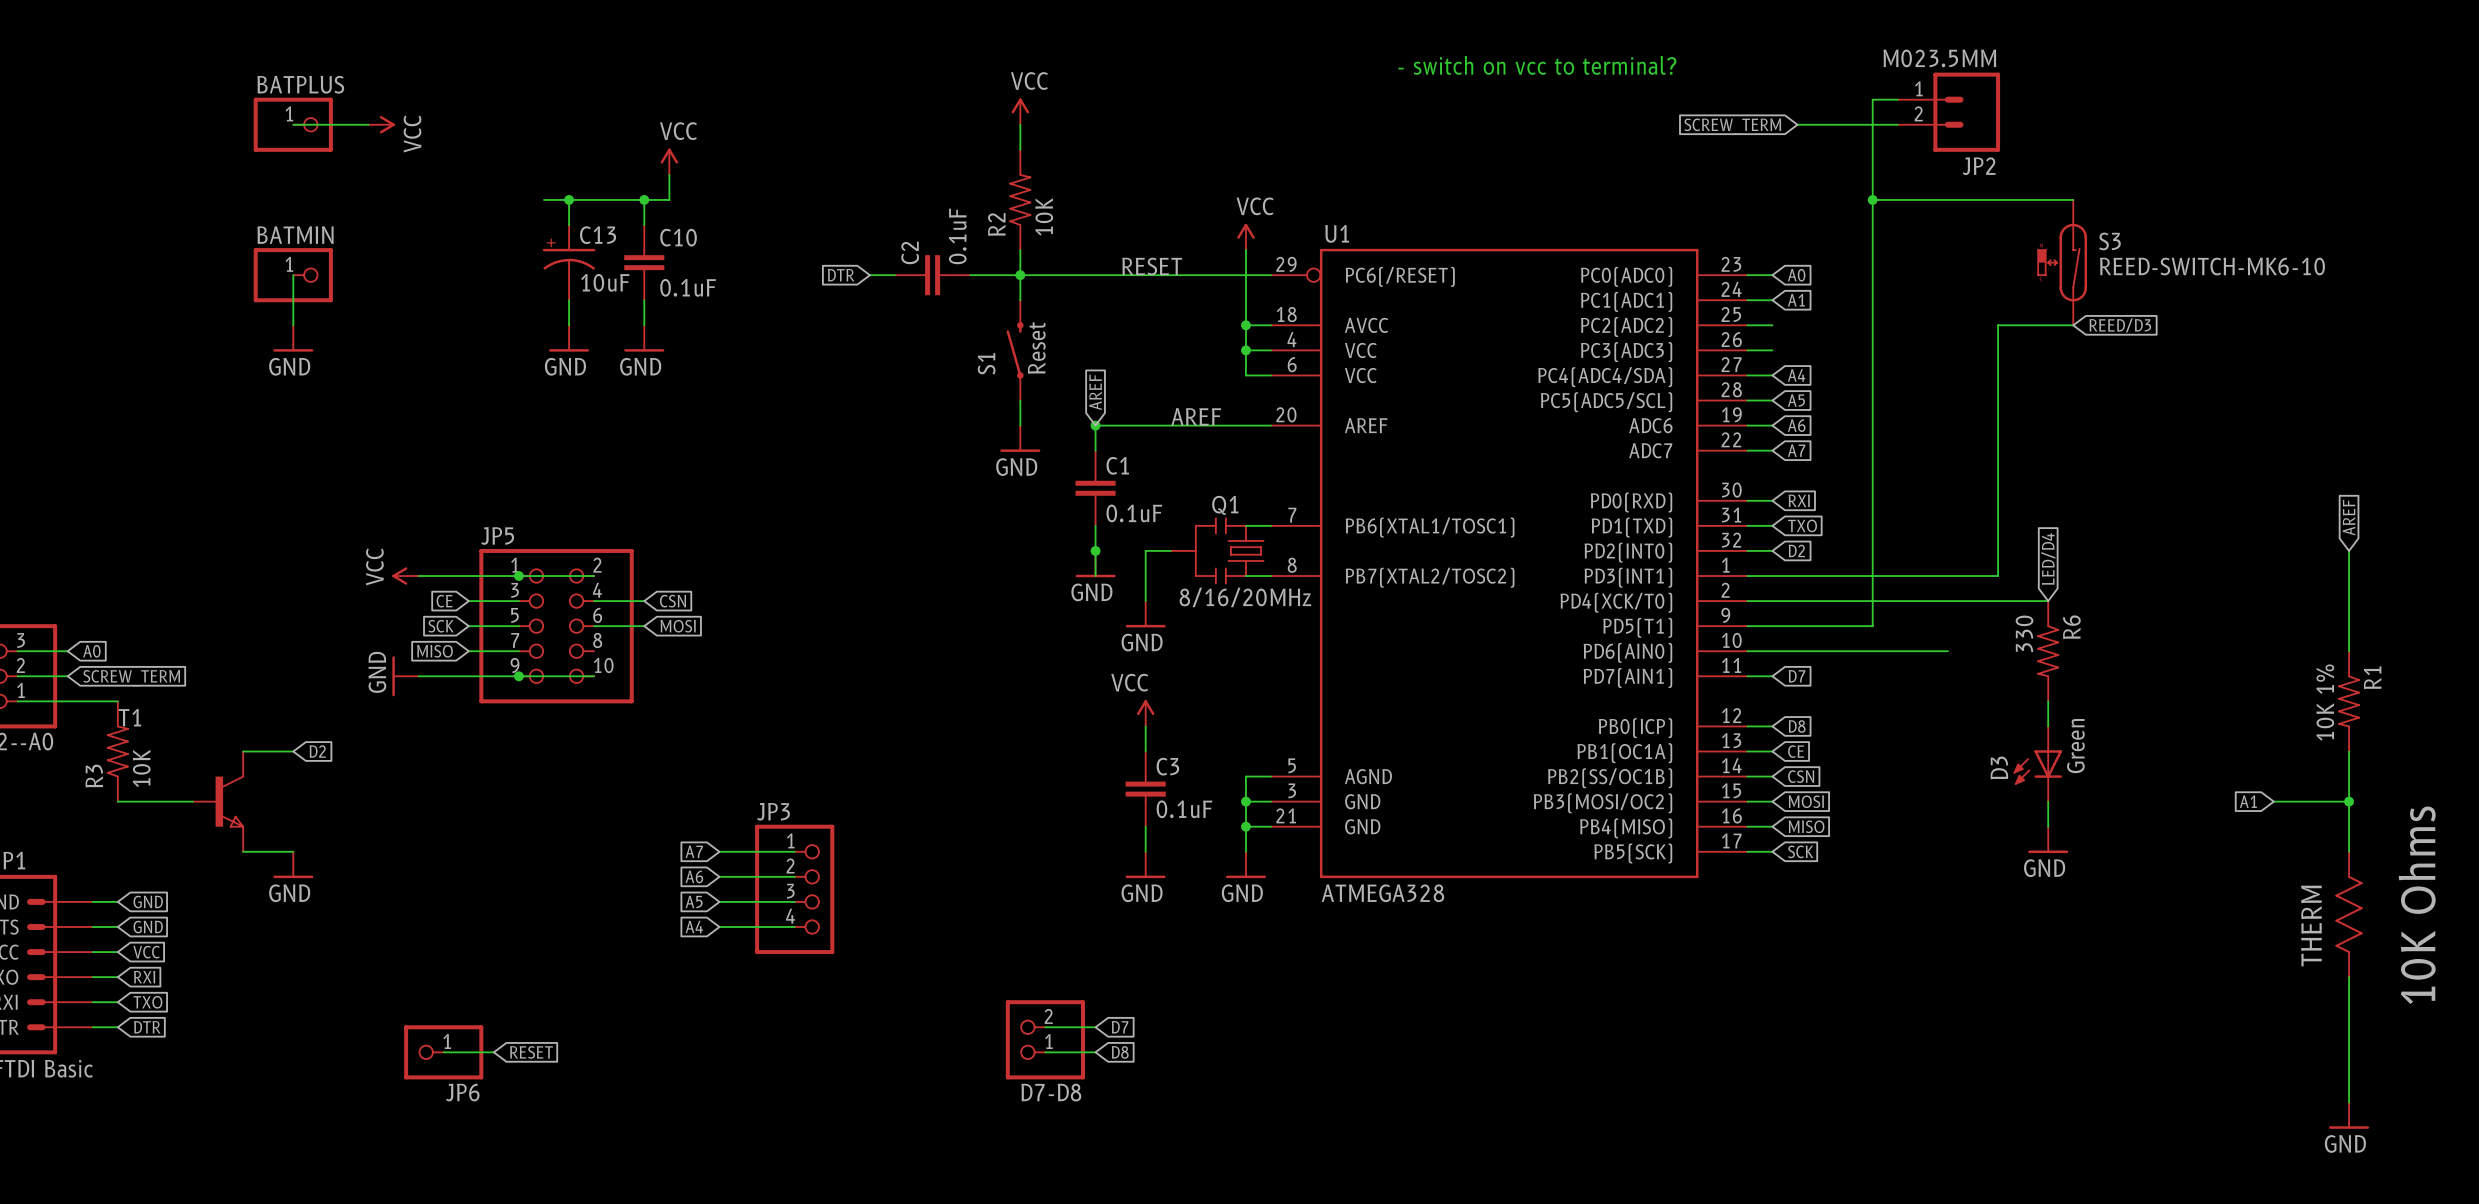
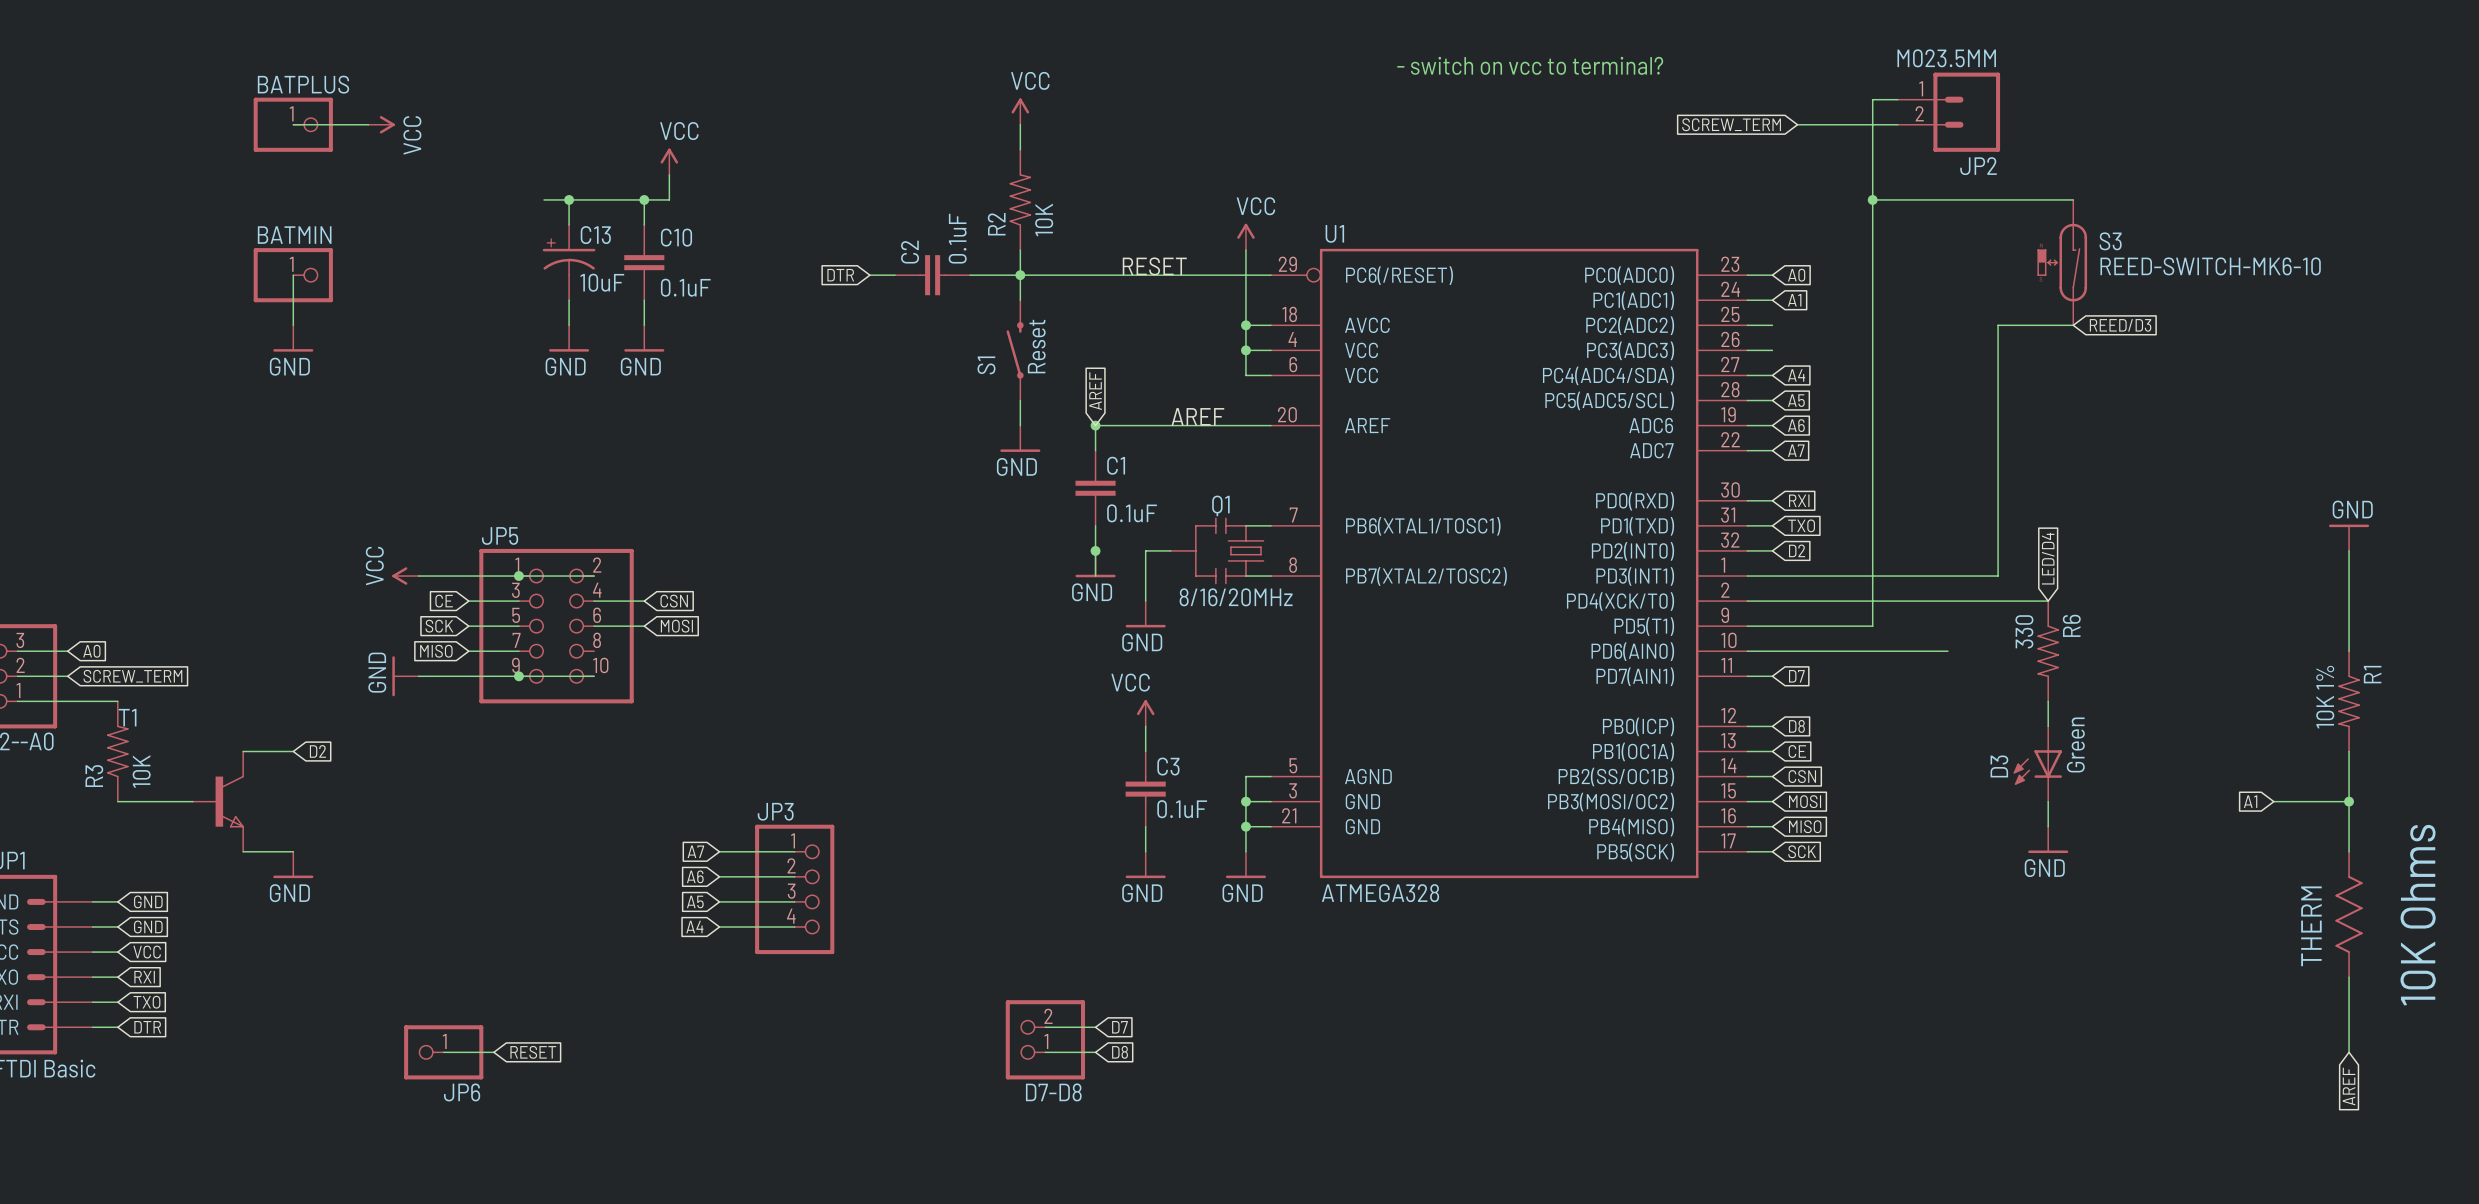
global label: AREF (2349, 517) -> none
power symbol: none -> GND (2349, 537)
wire: (2349, 1052) (2349, 1102) -> none
global label: none -> AREF (2349, 1086)
power symbol: GND (2349, 1115) -> none

